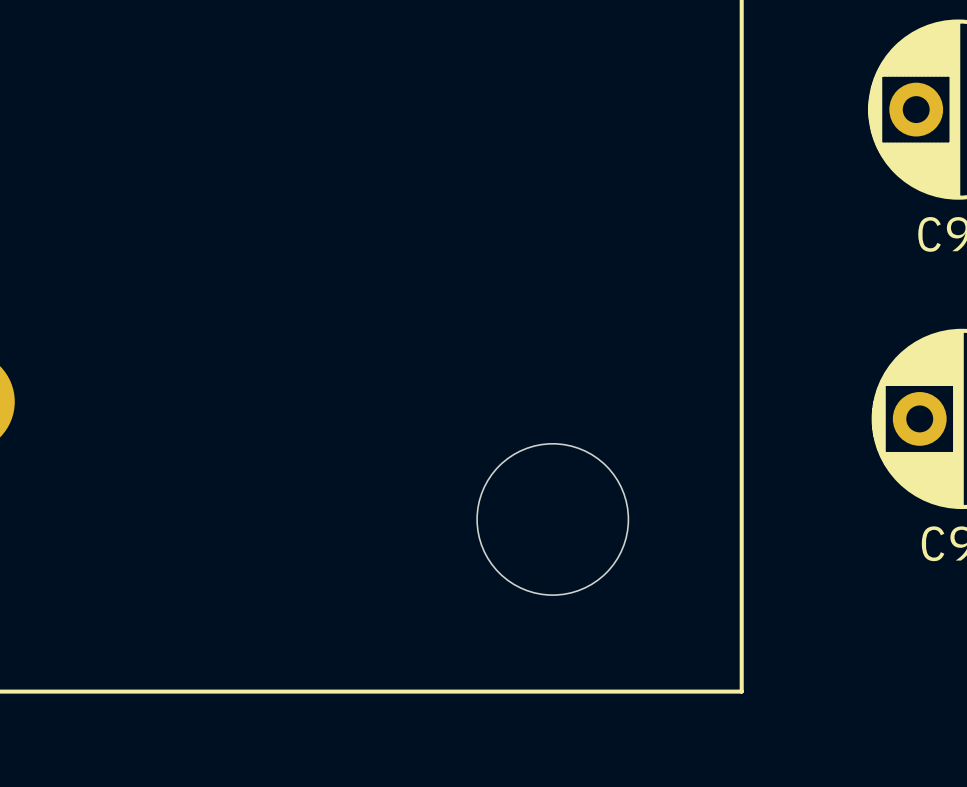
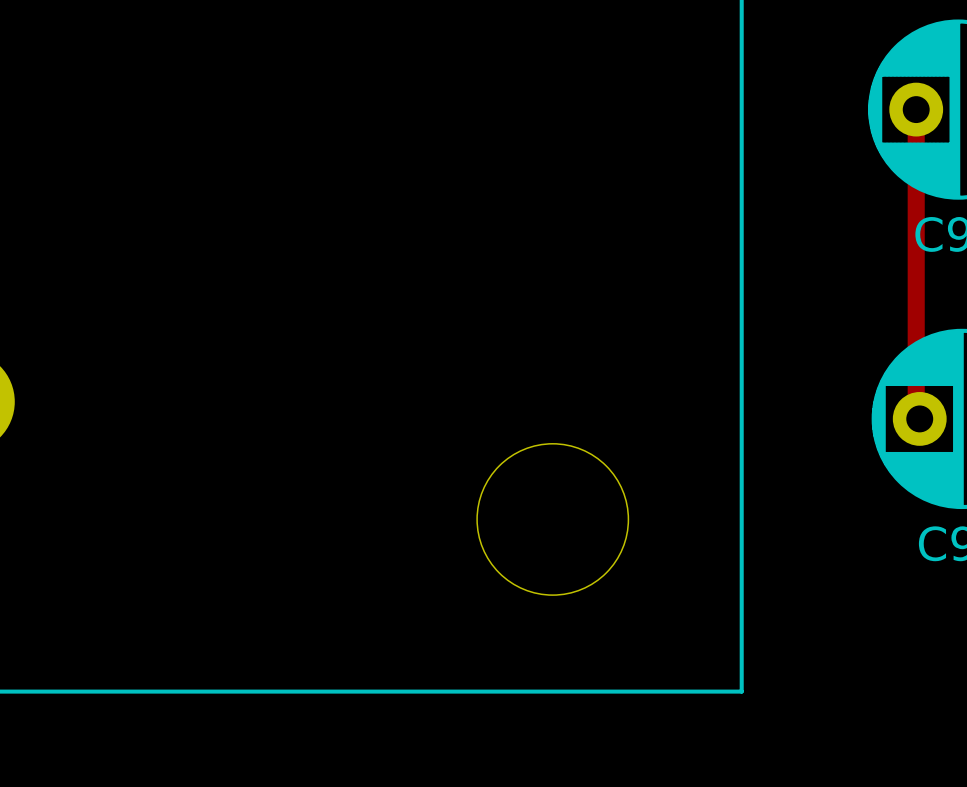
track: none -> (916, 109) (916, 415) (919, 418)

